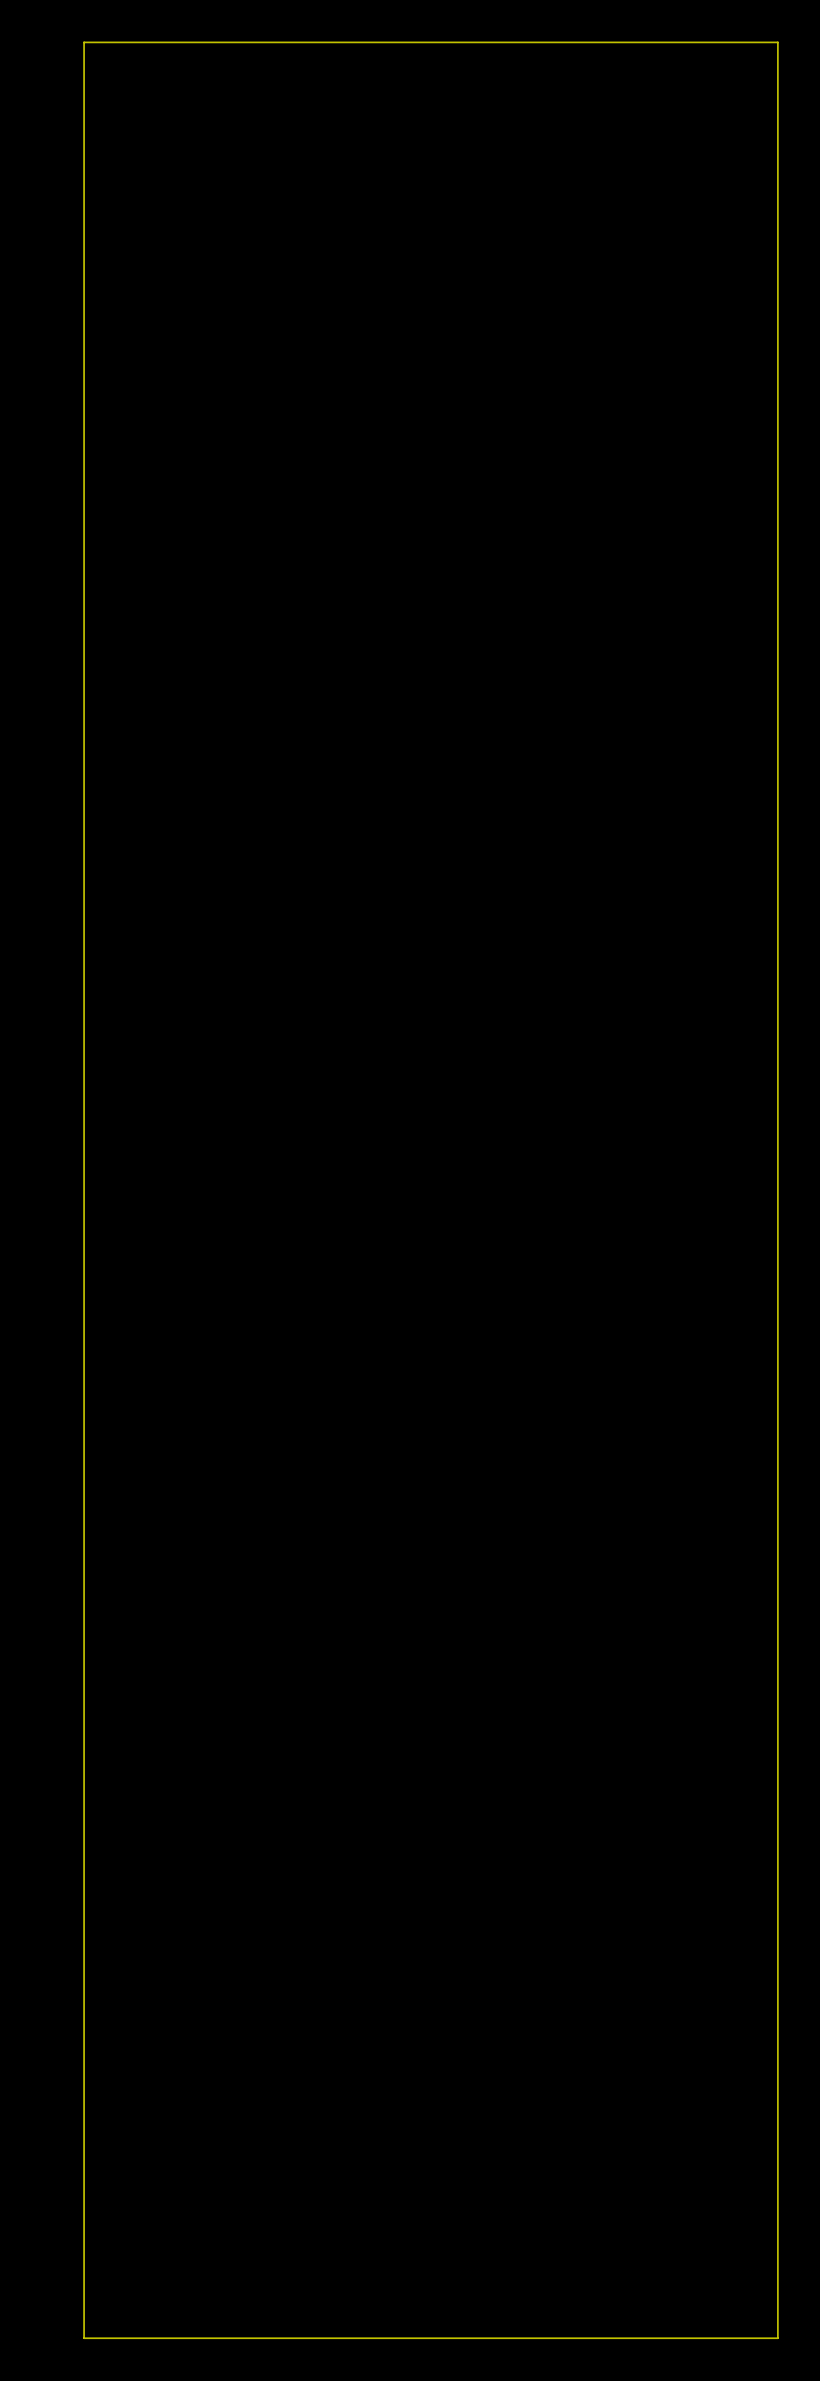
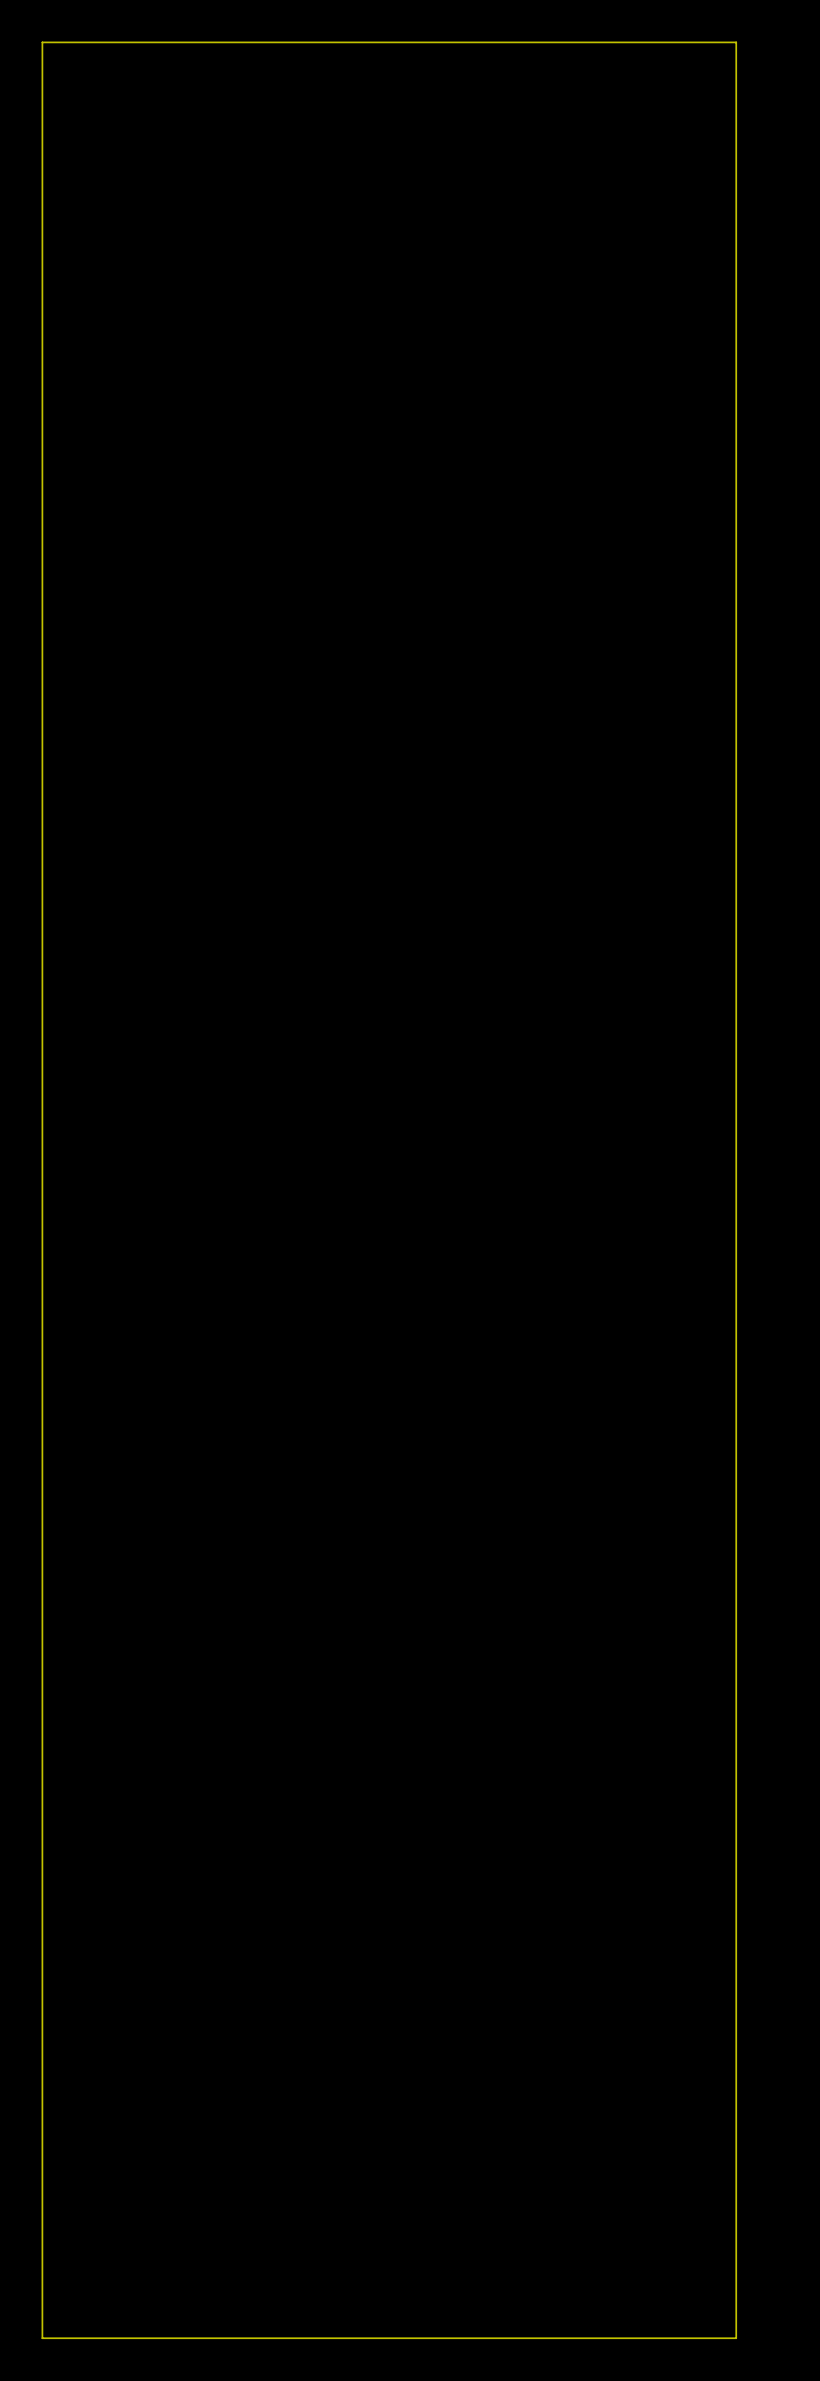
board edge: (84, 42) (84, 2338) -> (84, 42) (42, 42) (42, 2338) (84, 2338)
board edge: (736, 42) (777, 42) (777, 2338) (736, 2338) -> (736, 42) (736, 2338)

